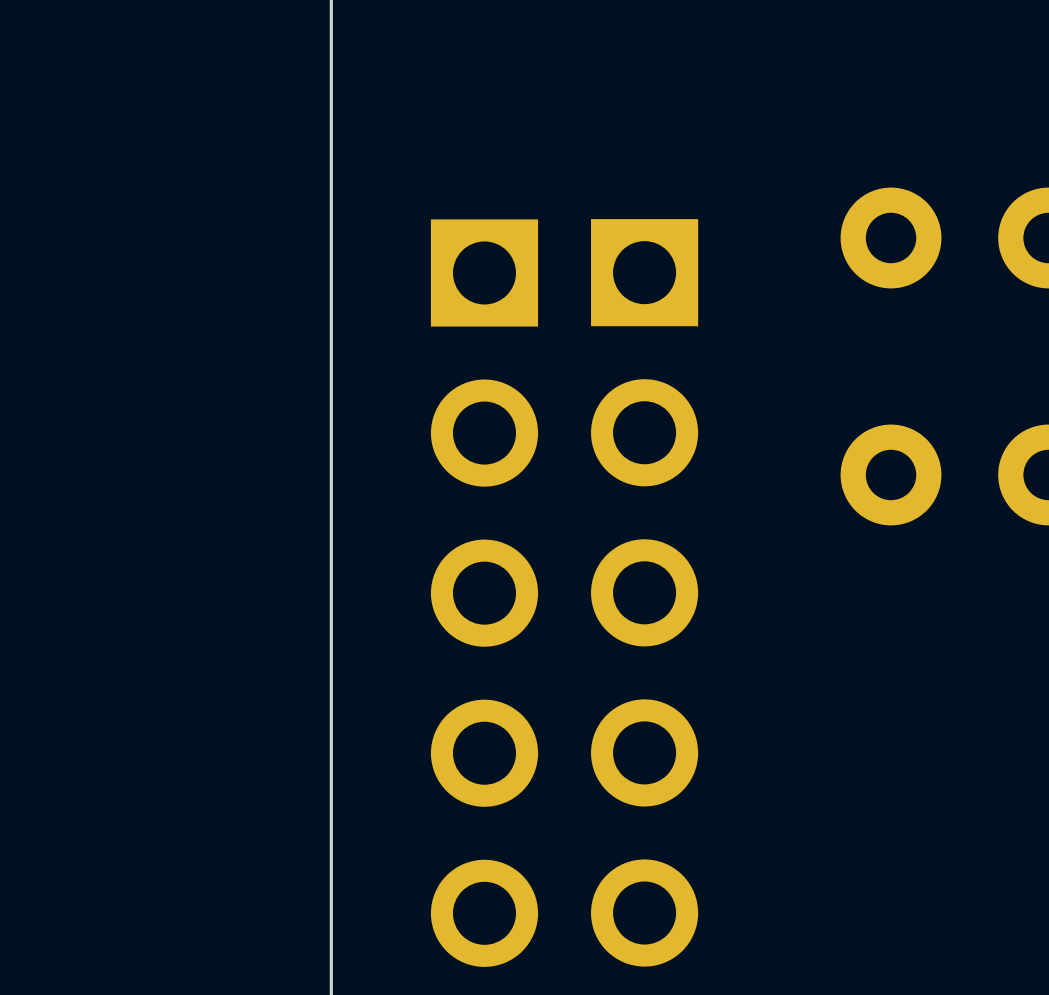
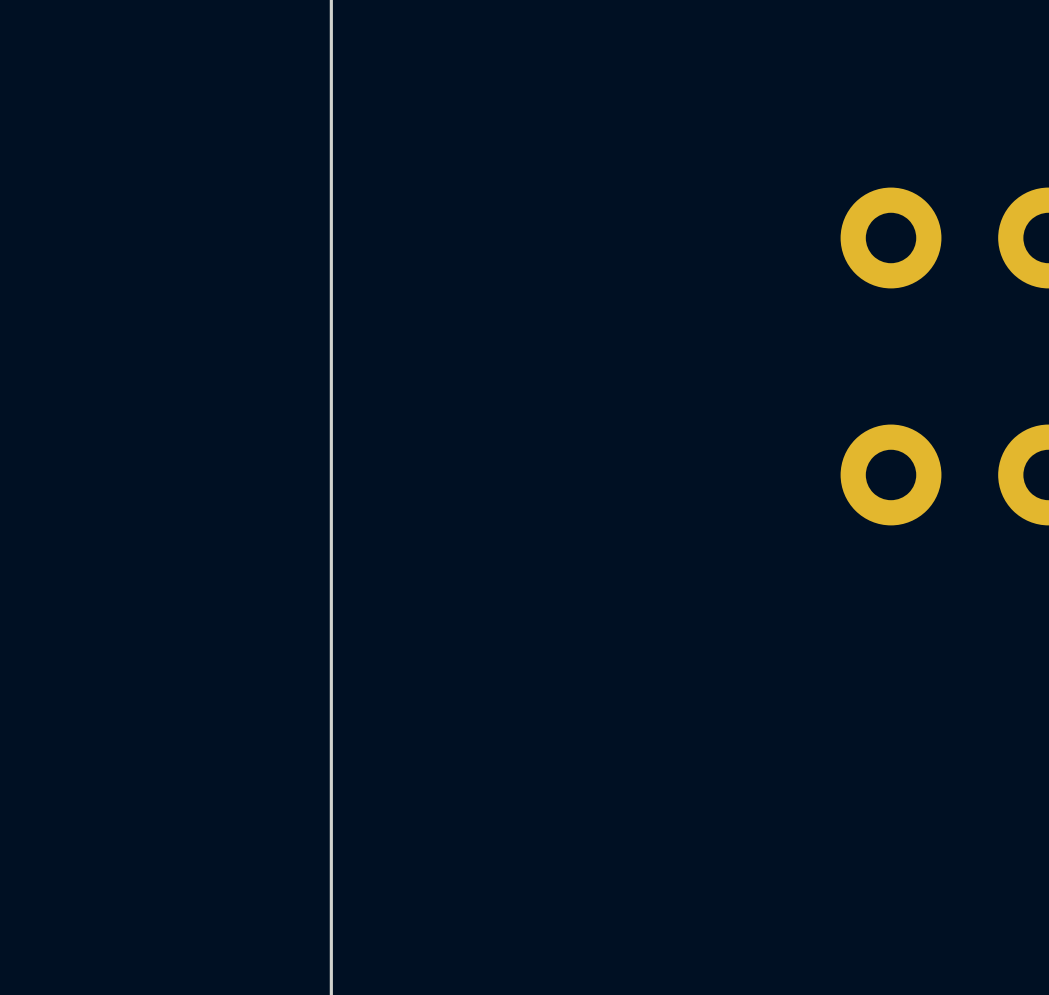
part: (644, 592) -> none
part: (484, 593) -> none

